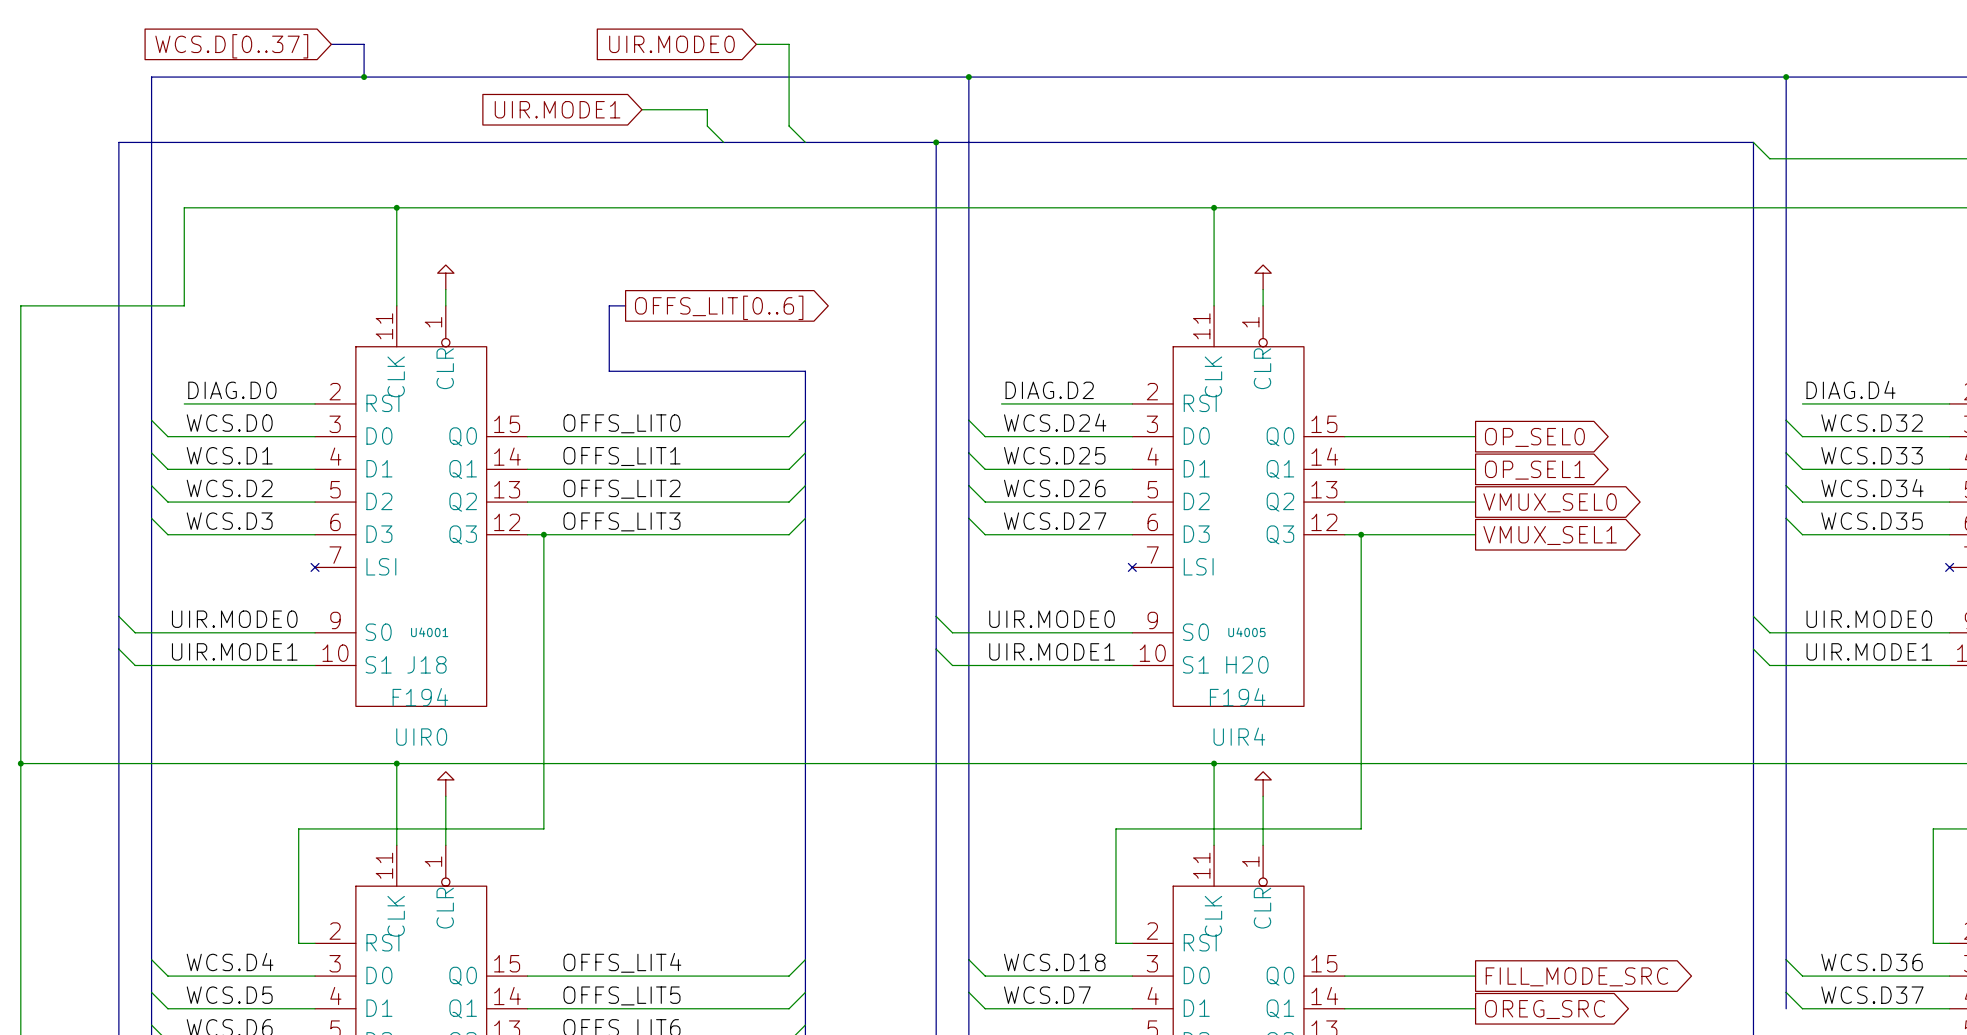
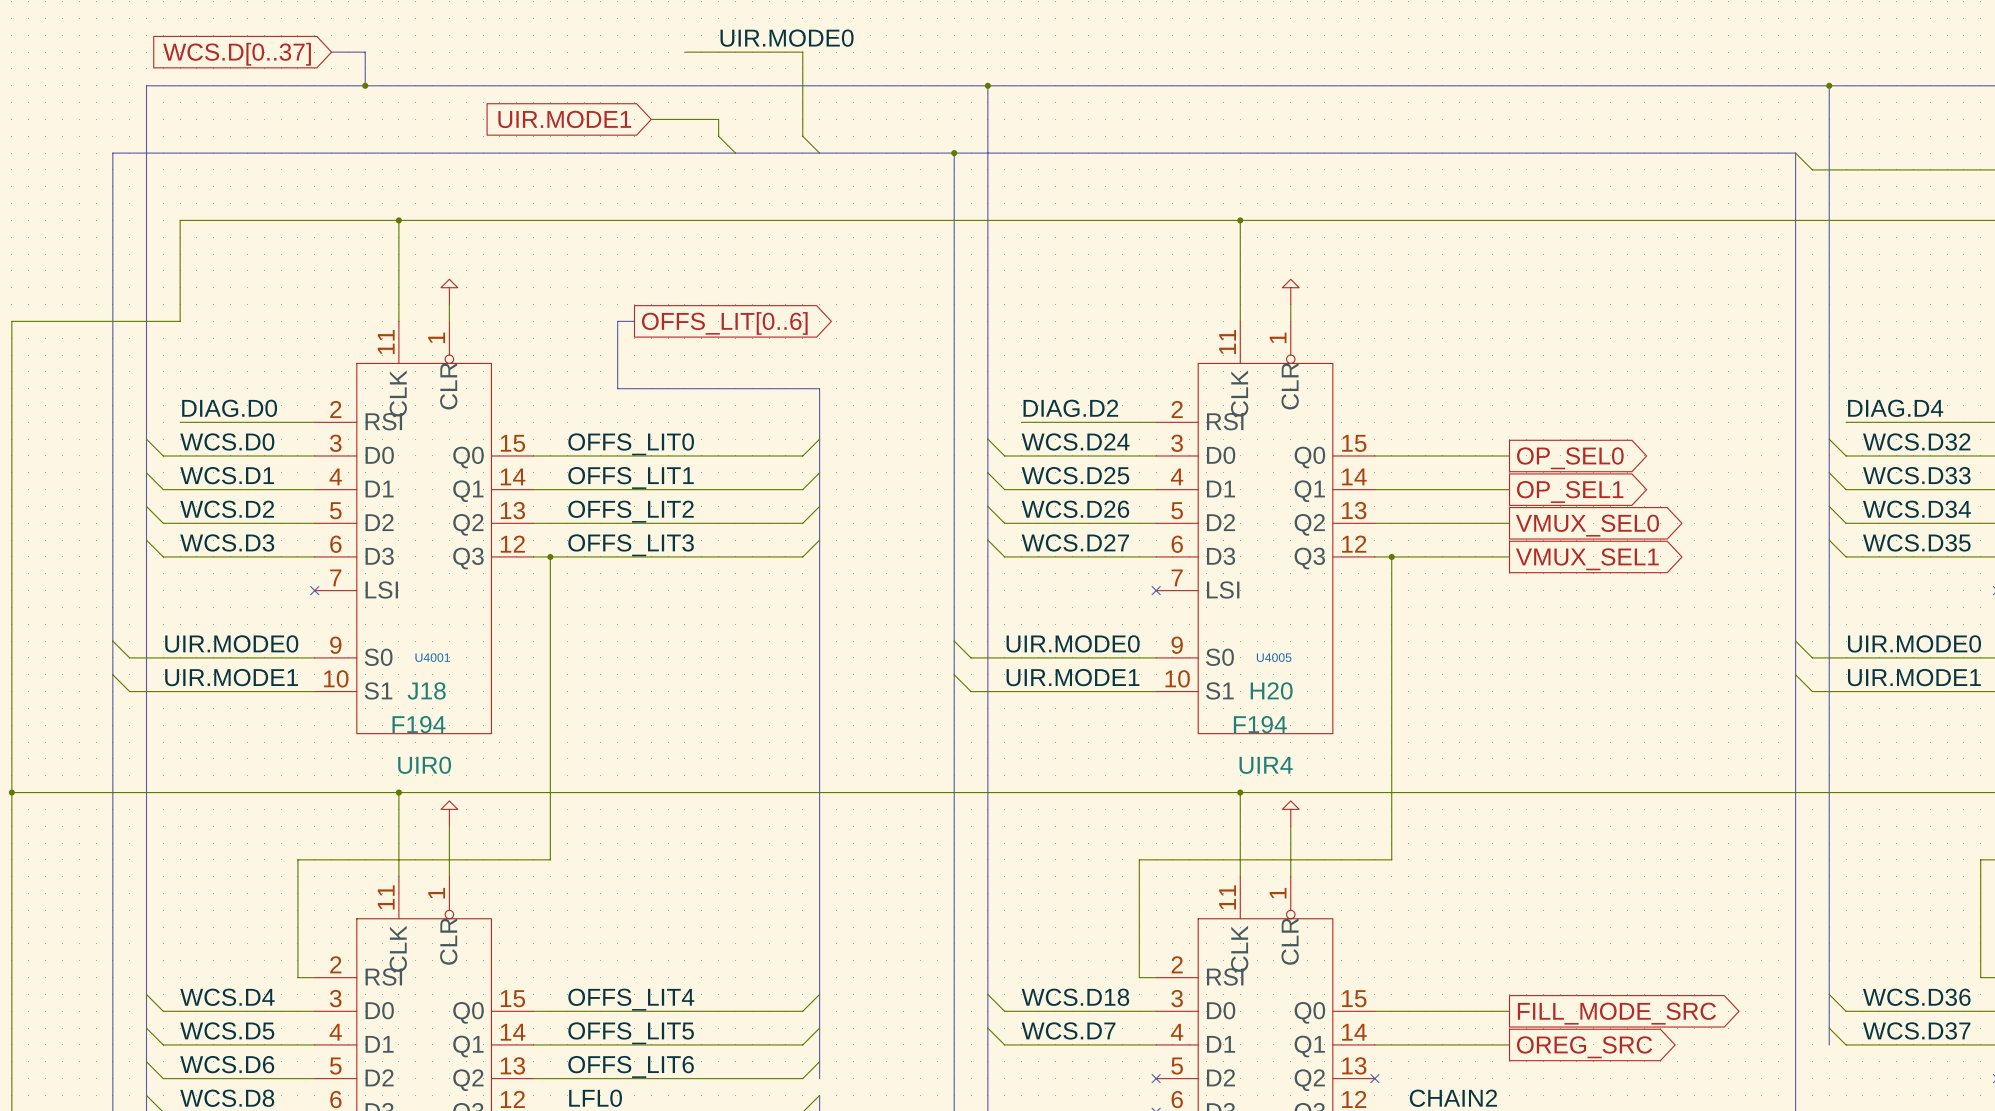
label: none -> UIR.MODE0 (787, 38)
global label: UIR.MODE0 (671, 44) -> none
wire: none -> (684, 52) (769, 52)

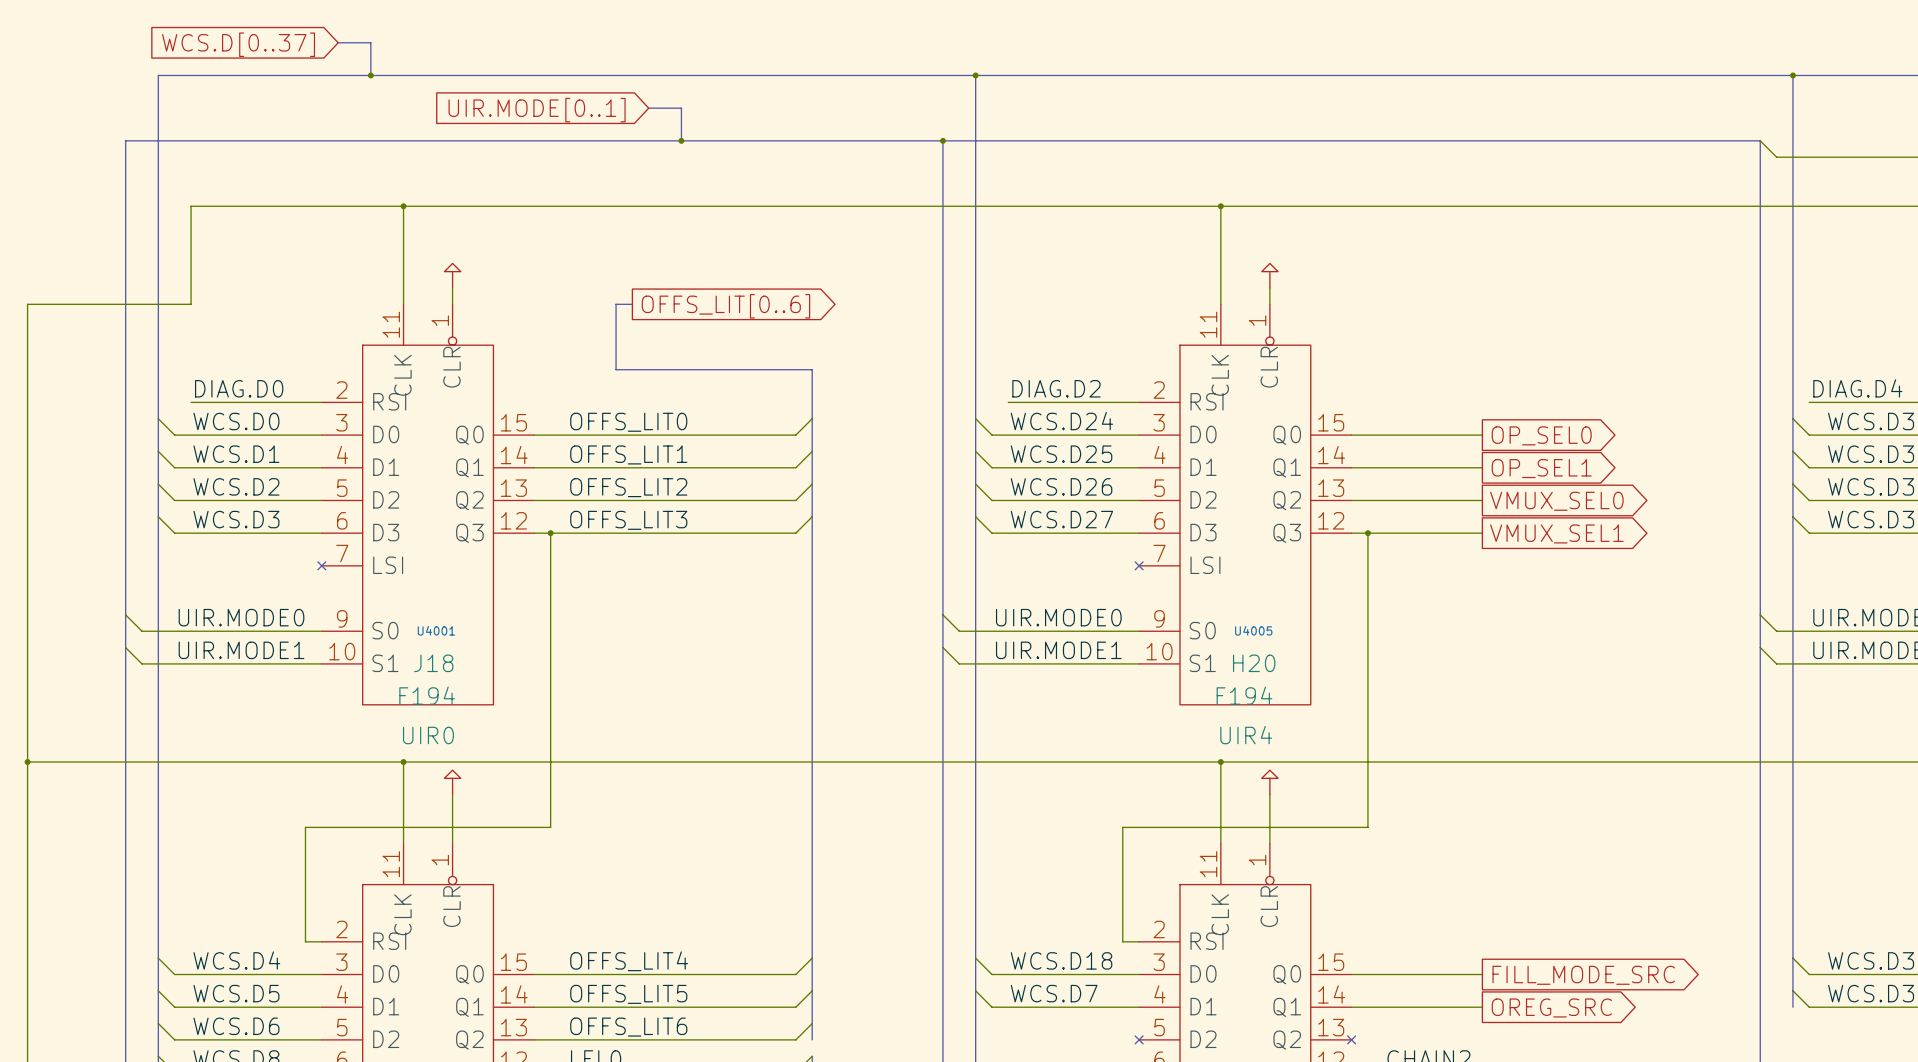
label: UIR.MODE0 (787, 38) -> none
wire: (684, 52) (802, 52) (802, 136) (819, 153) -> none
global label: UIR.MODE1 (564, 119) -> UIR.MODE[0..1] (537, 110)
bus: none -> (648, 108) (681, 108) (681, 140)
wire: (651, 119) (718, 119) (718, 136) (735, 153) -> none
junction: none -> (681, 140)

